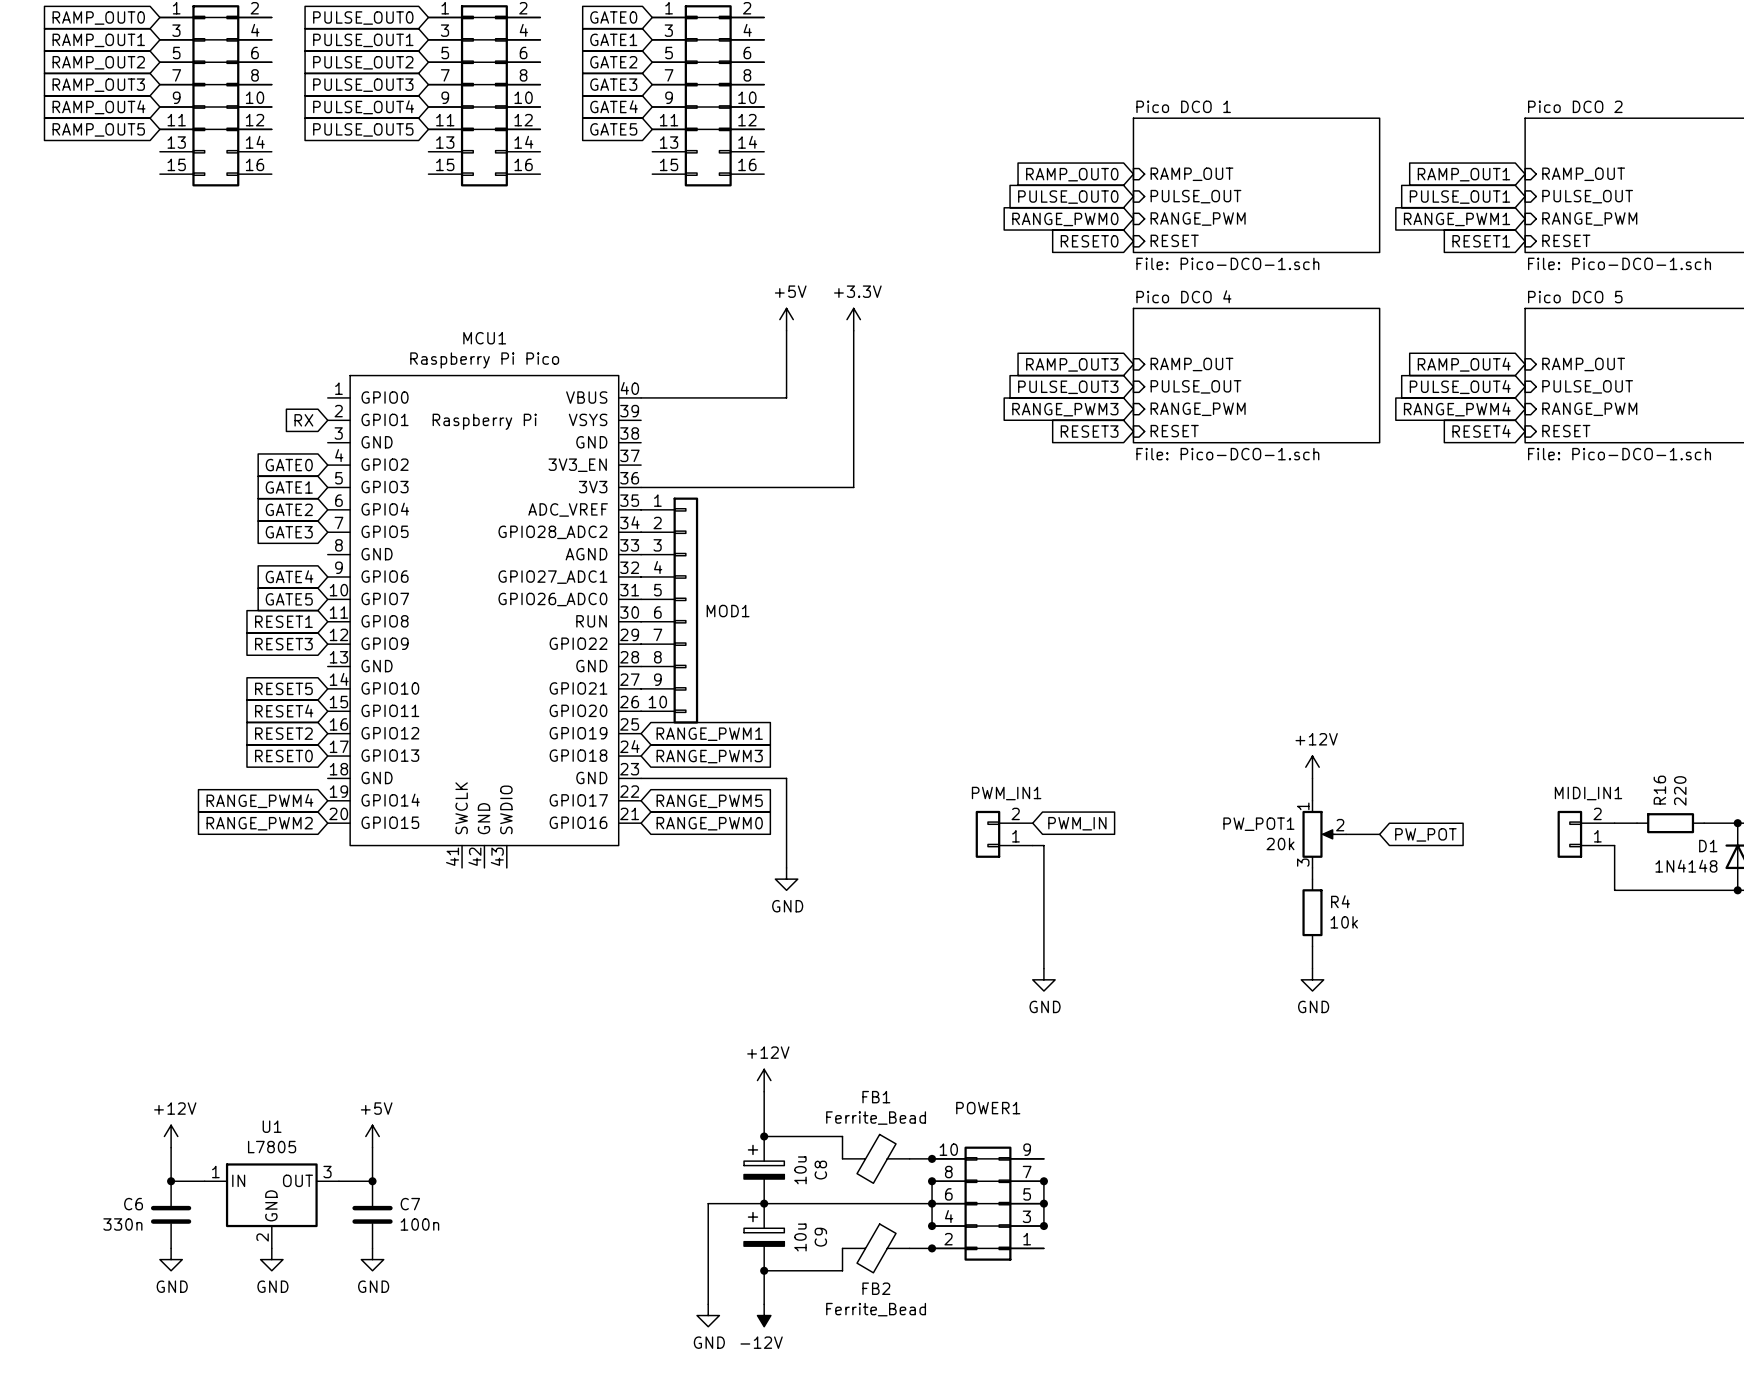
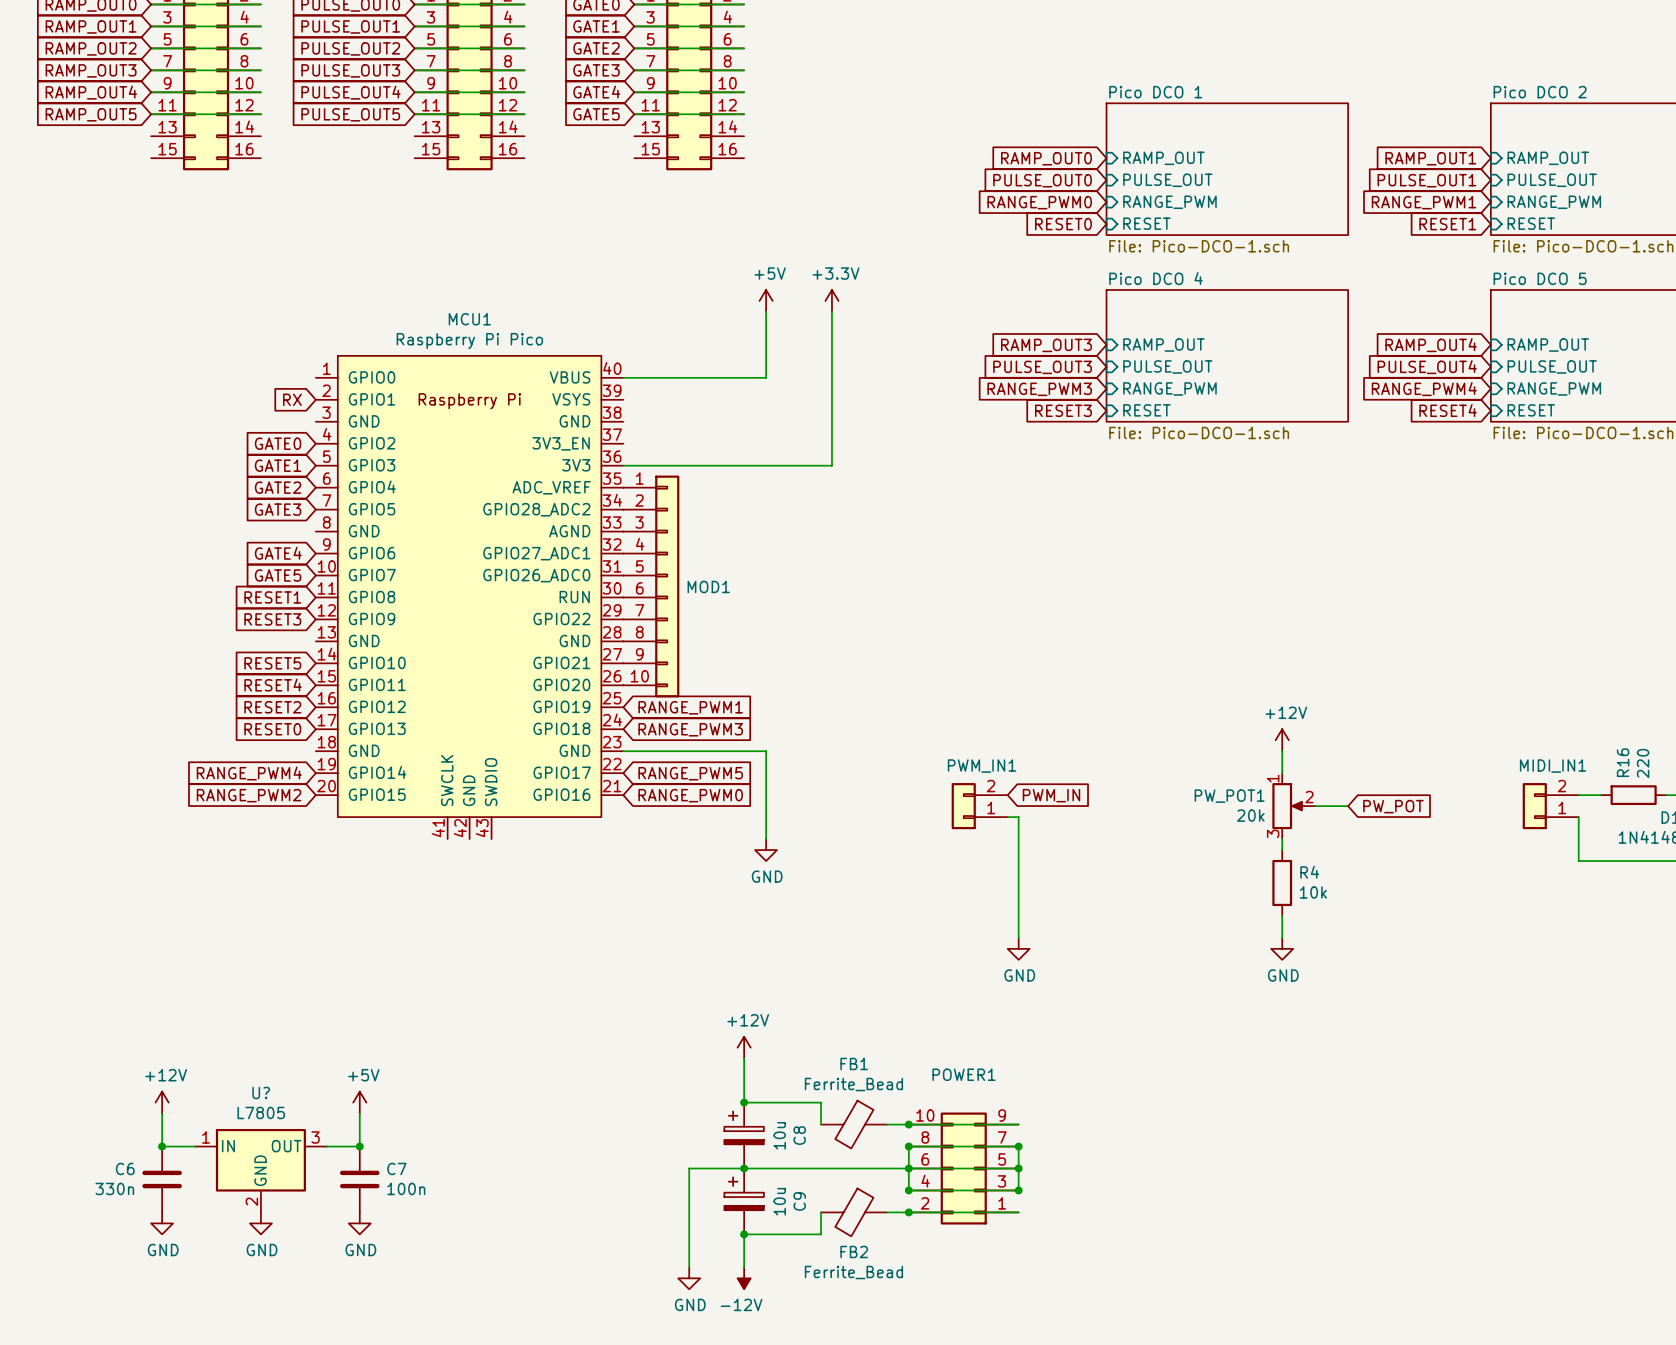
U1 name: U1 (272, 1126) -> U? (261, 1092)

